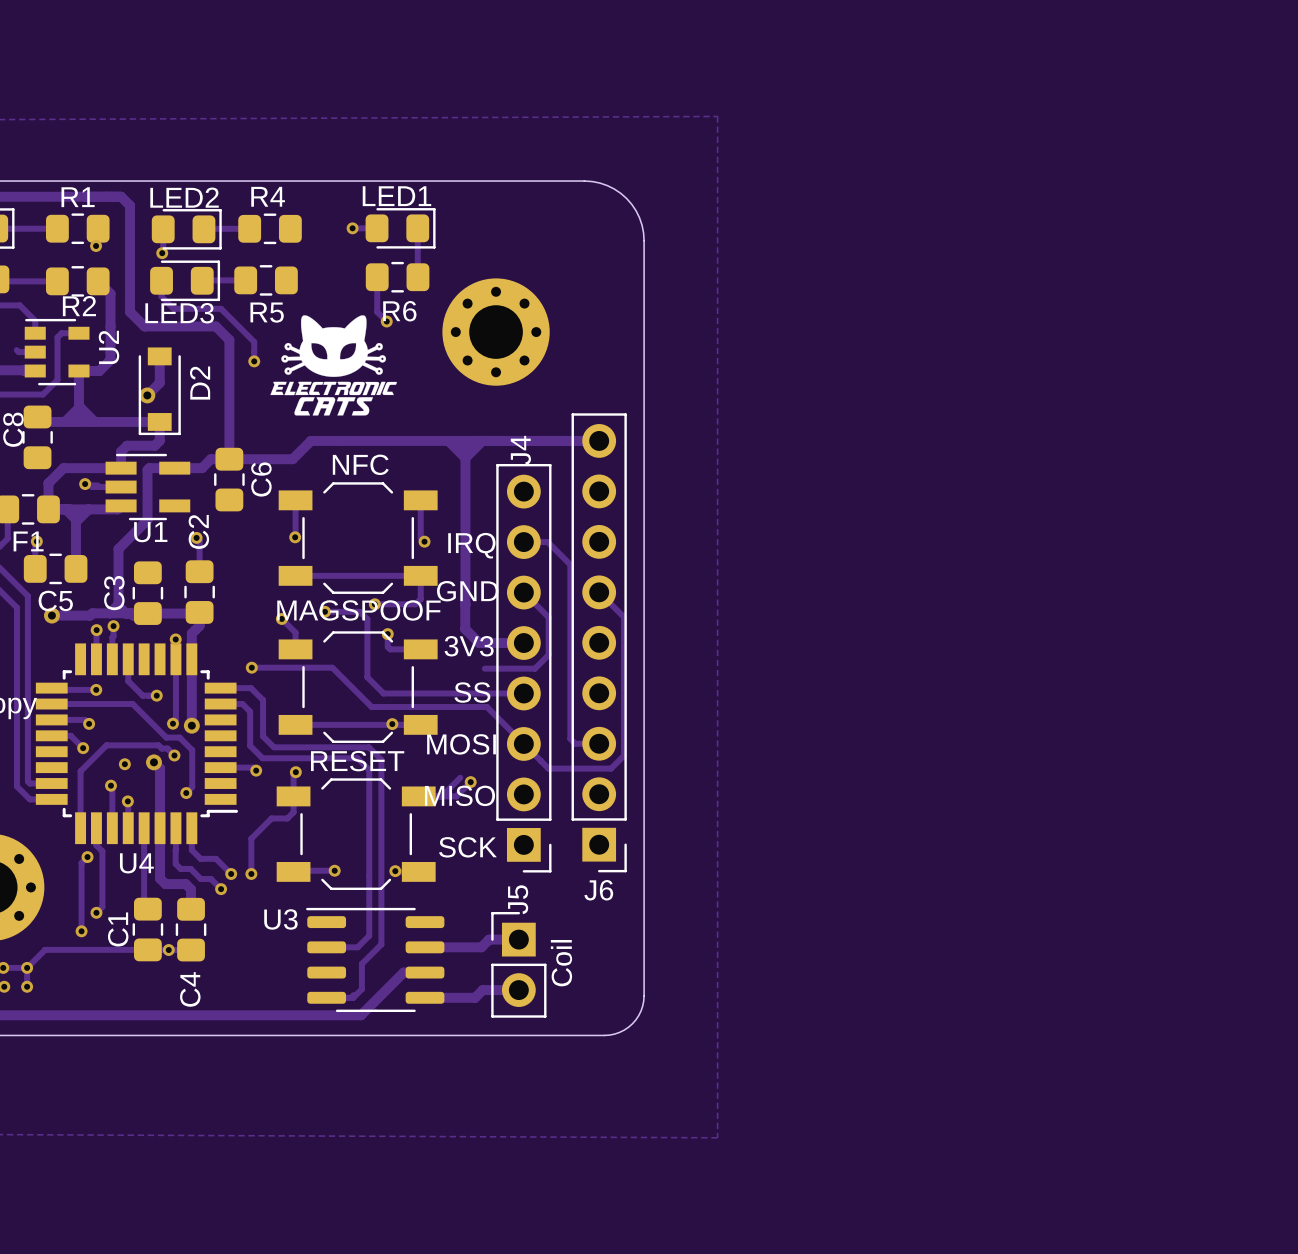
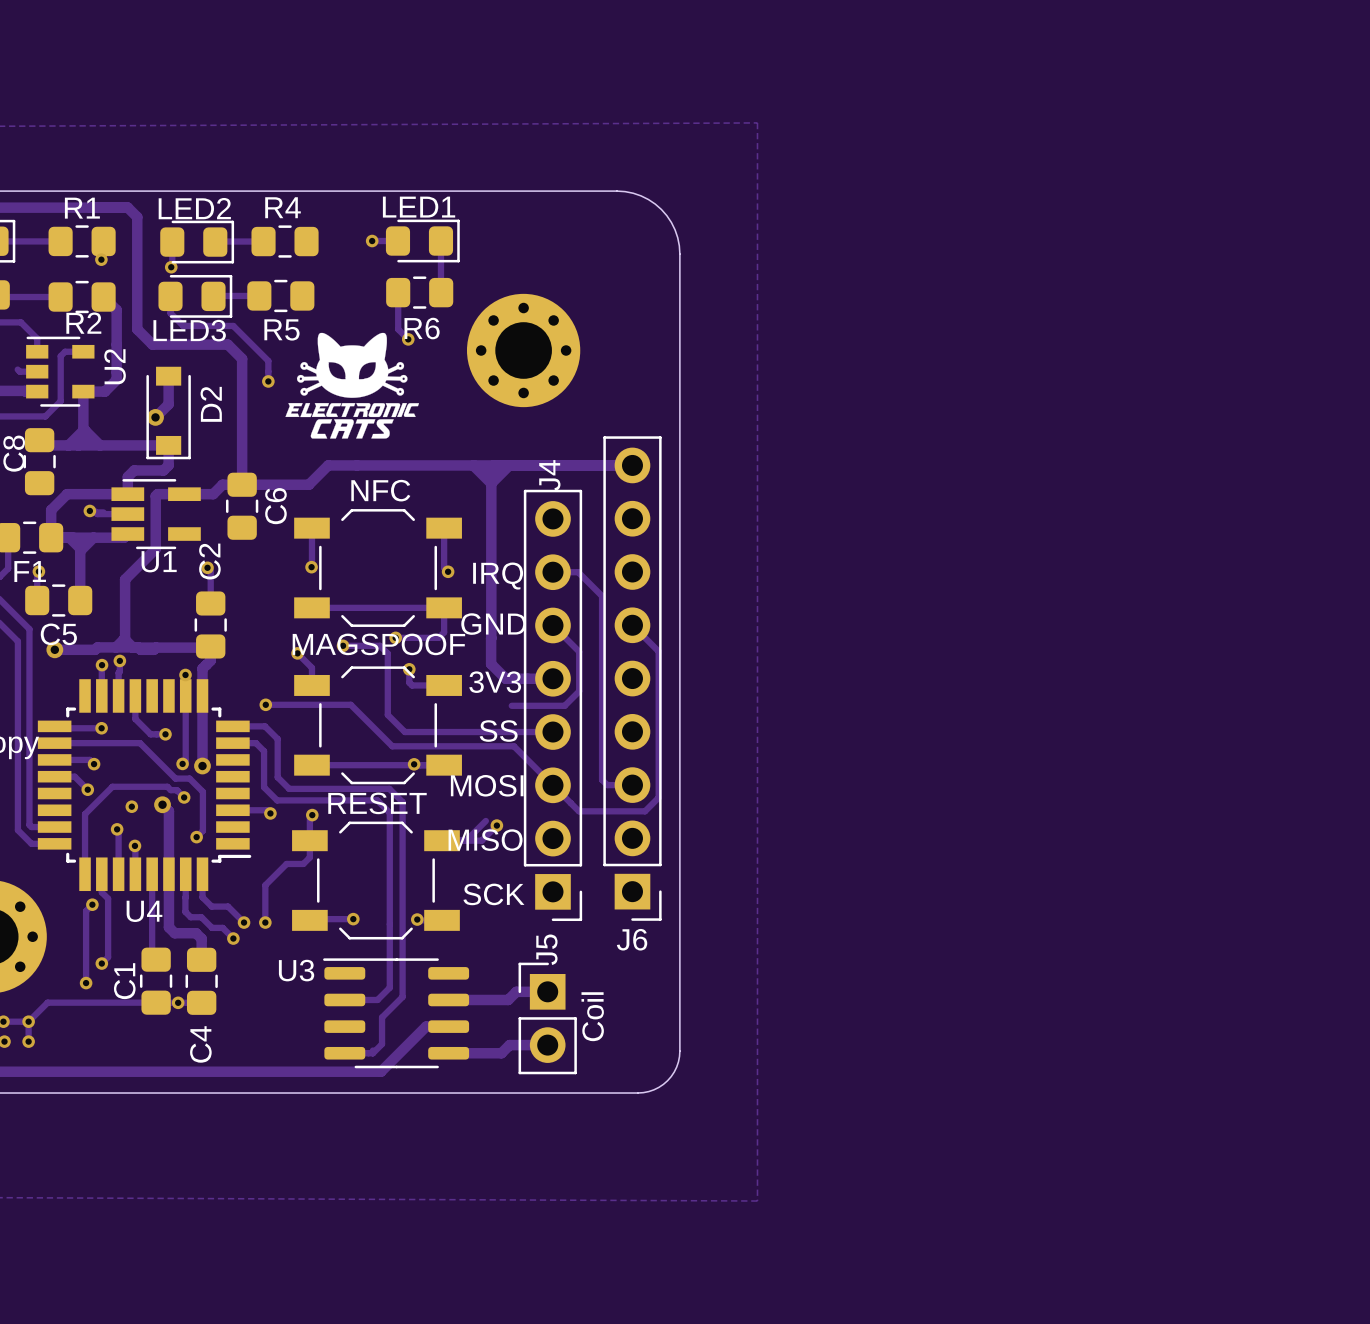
C3: (147, 593) -> none

